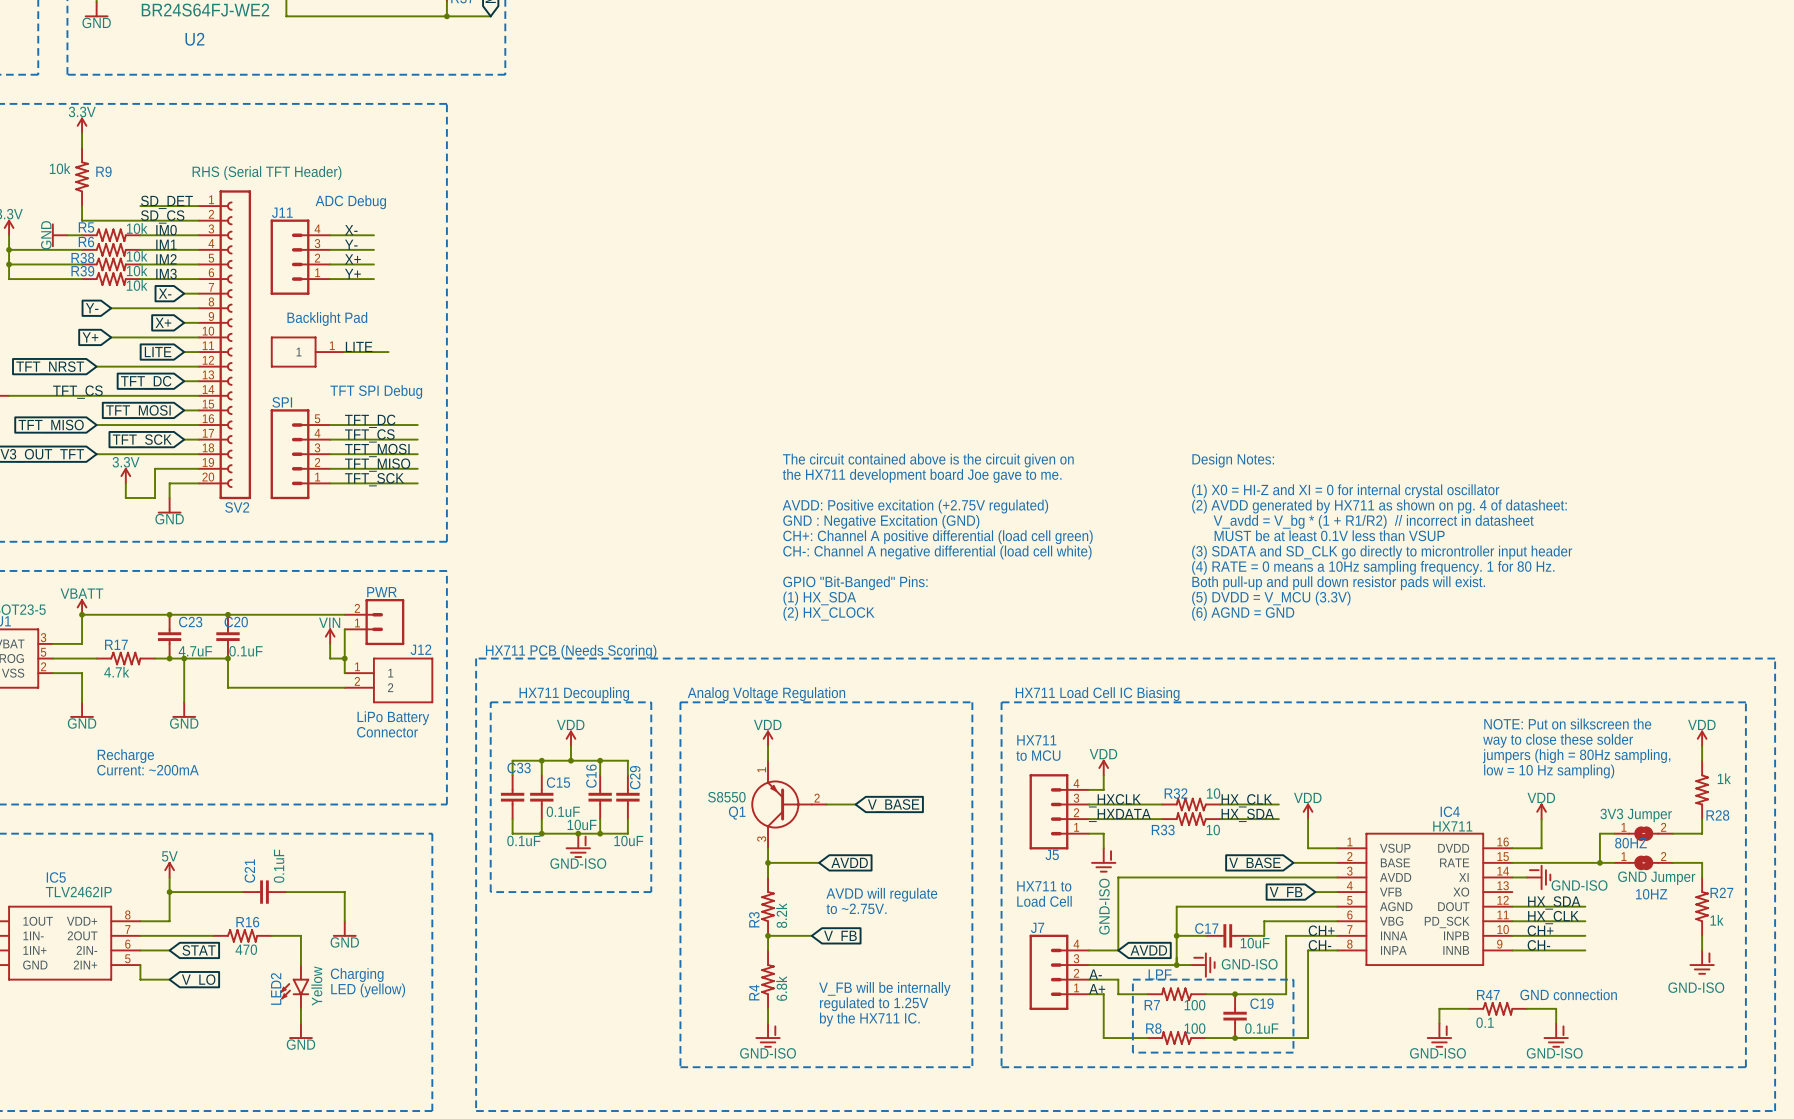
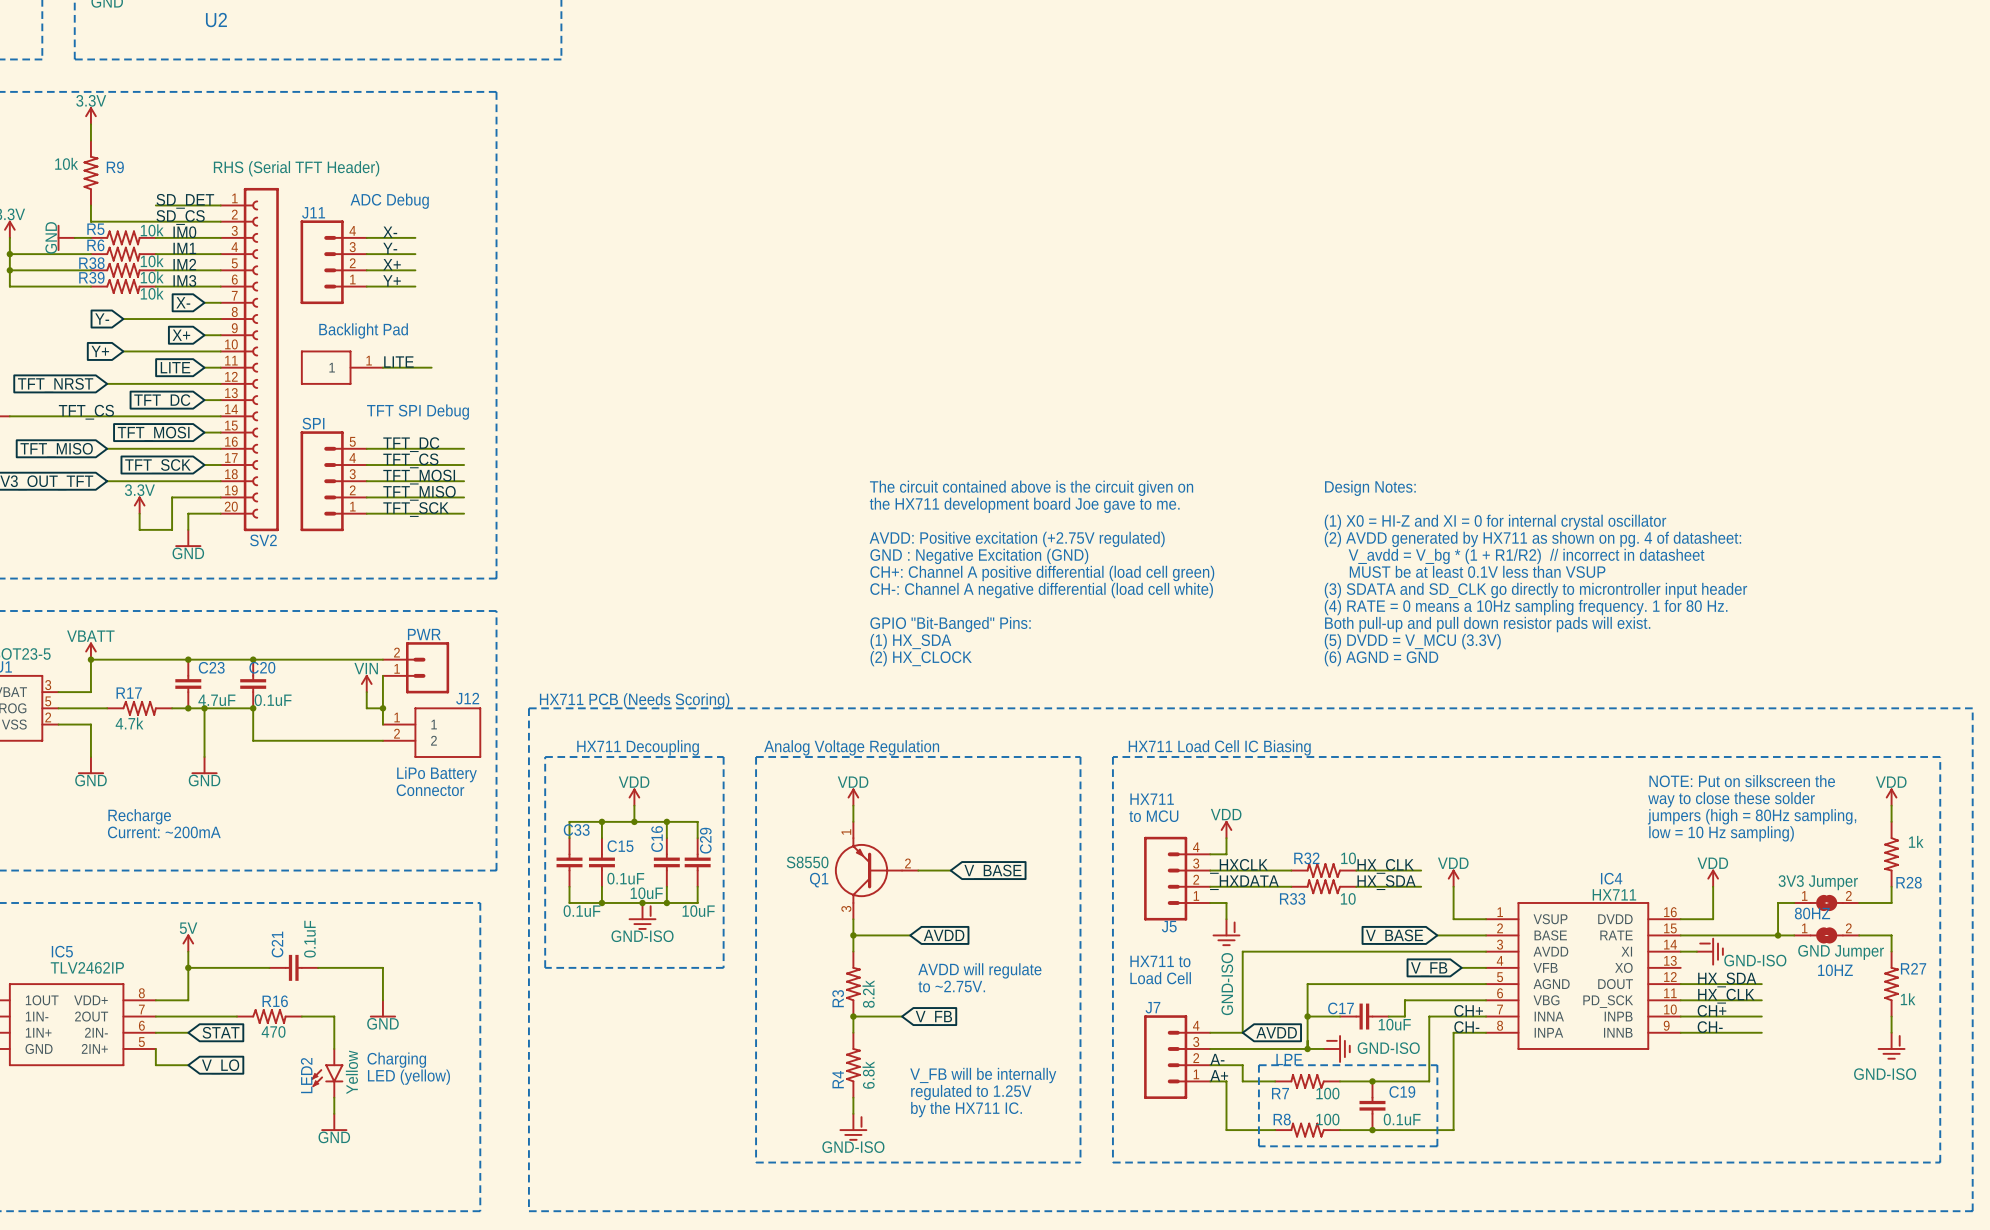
text: GND connection (1568, 994) -> none
wire: (1468, 1008) (1439, 1008) (1439, 1023) -> none
R47: 0.1 (1497, 1008) -> none
wire: (1526, 1008) (1556, 1008) (1556, 1023) -> none
power symbol: GND-ISO (1439, 1035) -> none
power symbol: GND-ISO (1556, 1035) -> none

